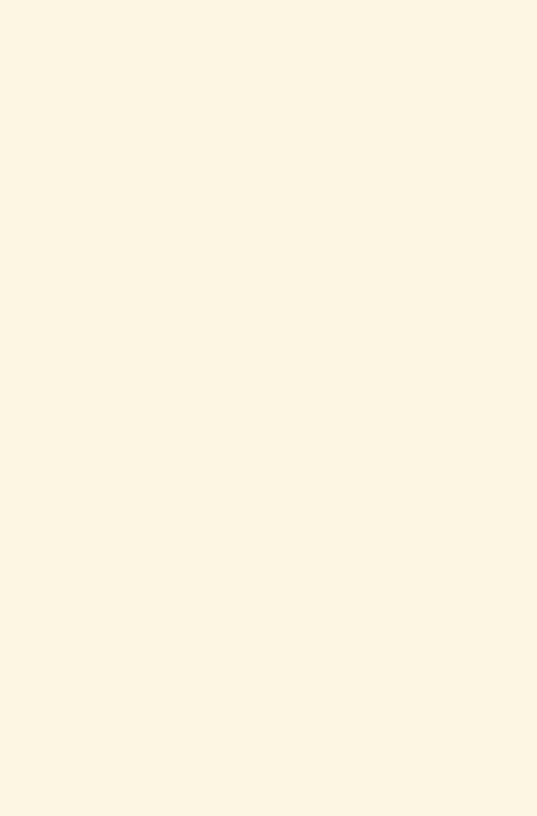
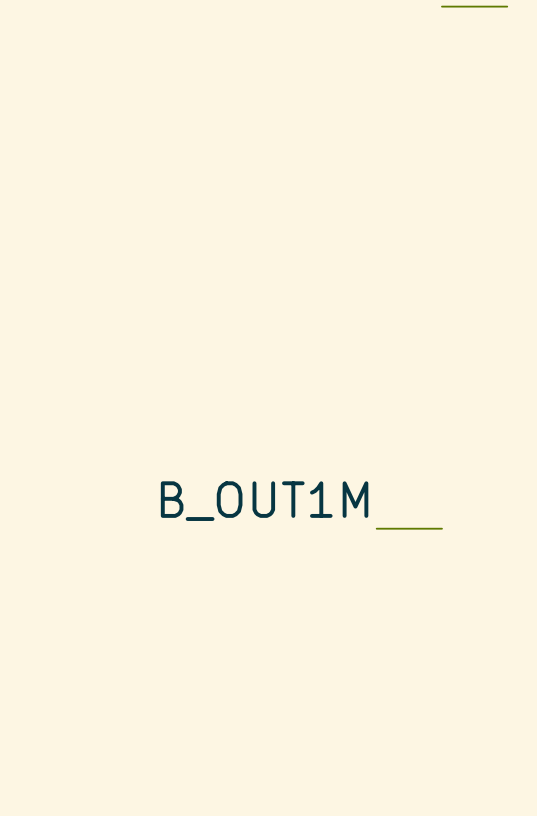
wire: none -> (441, 6) (507, 6)
label: none -> B_OUT1M (264, 501)
wire: none -> (376, 528) (441, 528)

